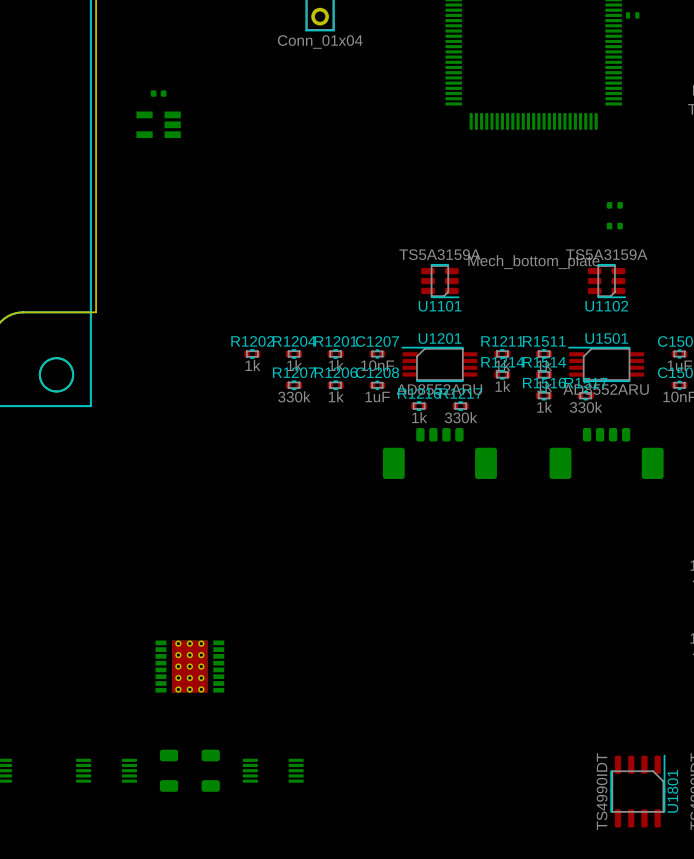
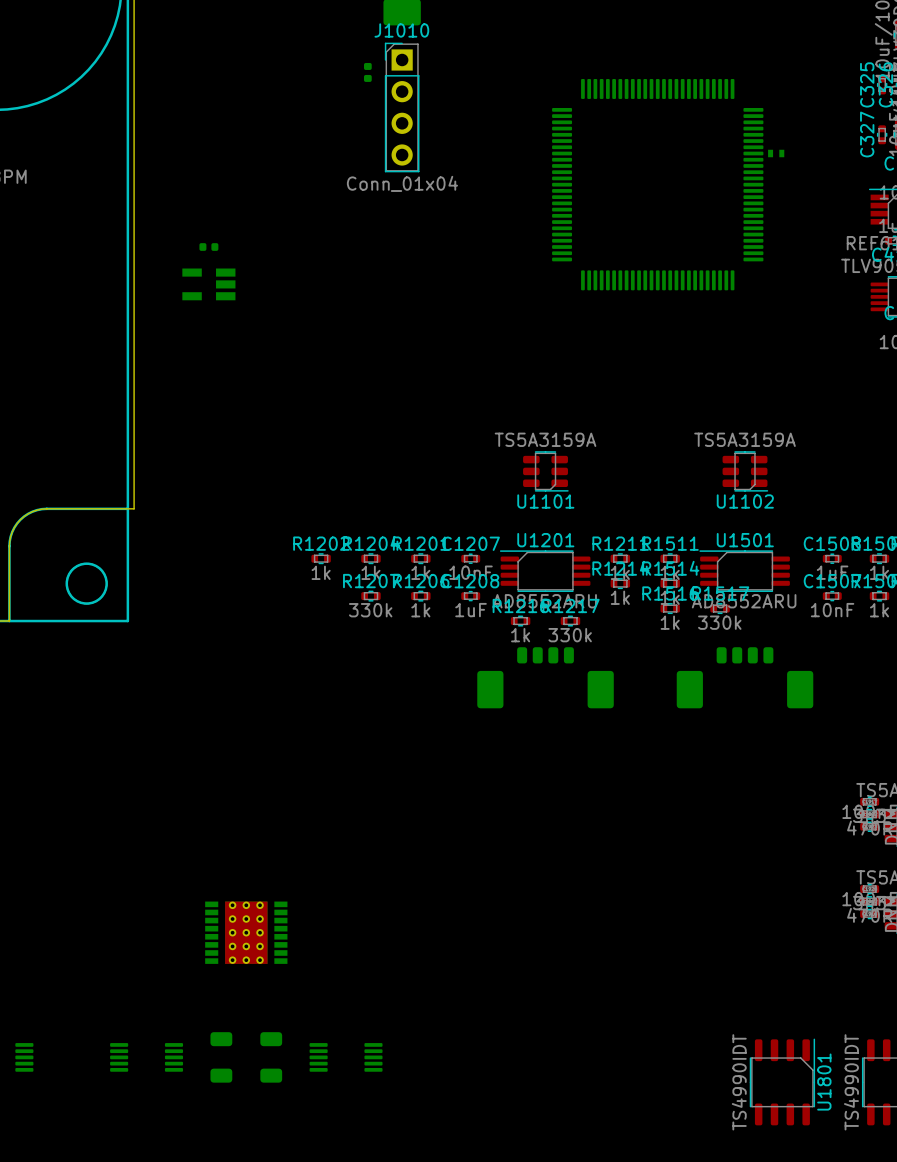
part: (614, 205) -> none
part: (614, 226) -> none
drawing: [468, 255, 600, 270] -> none

